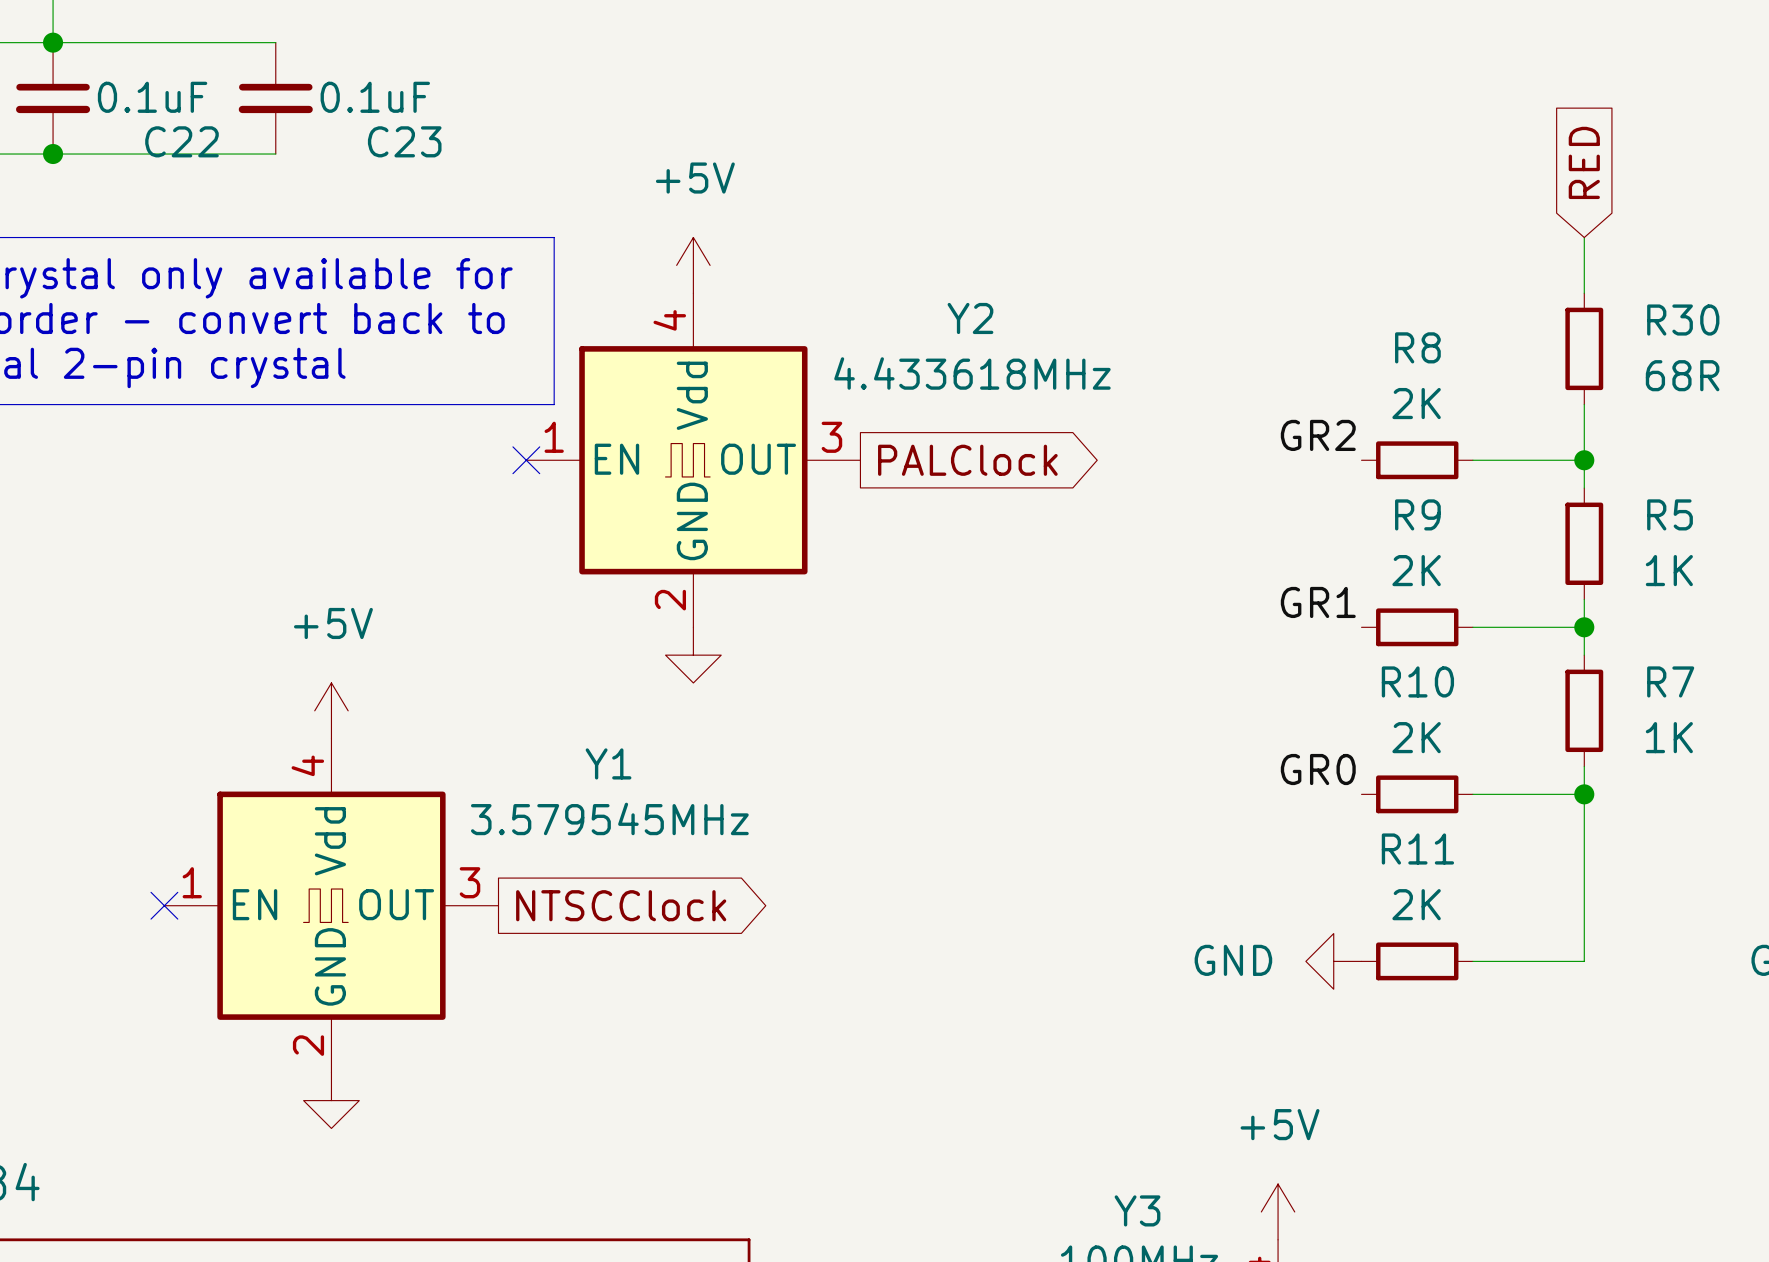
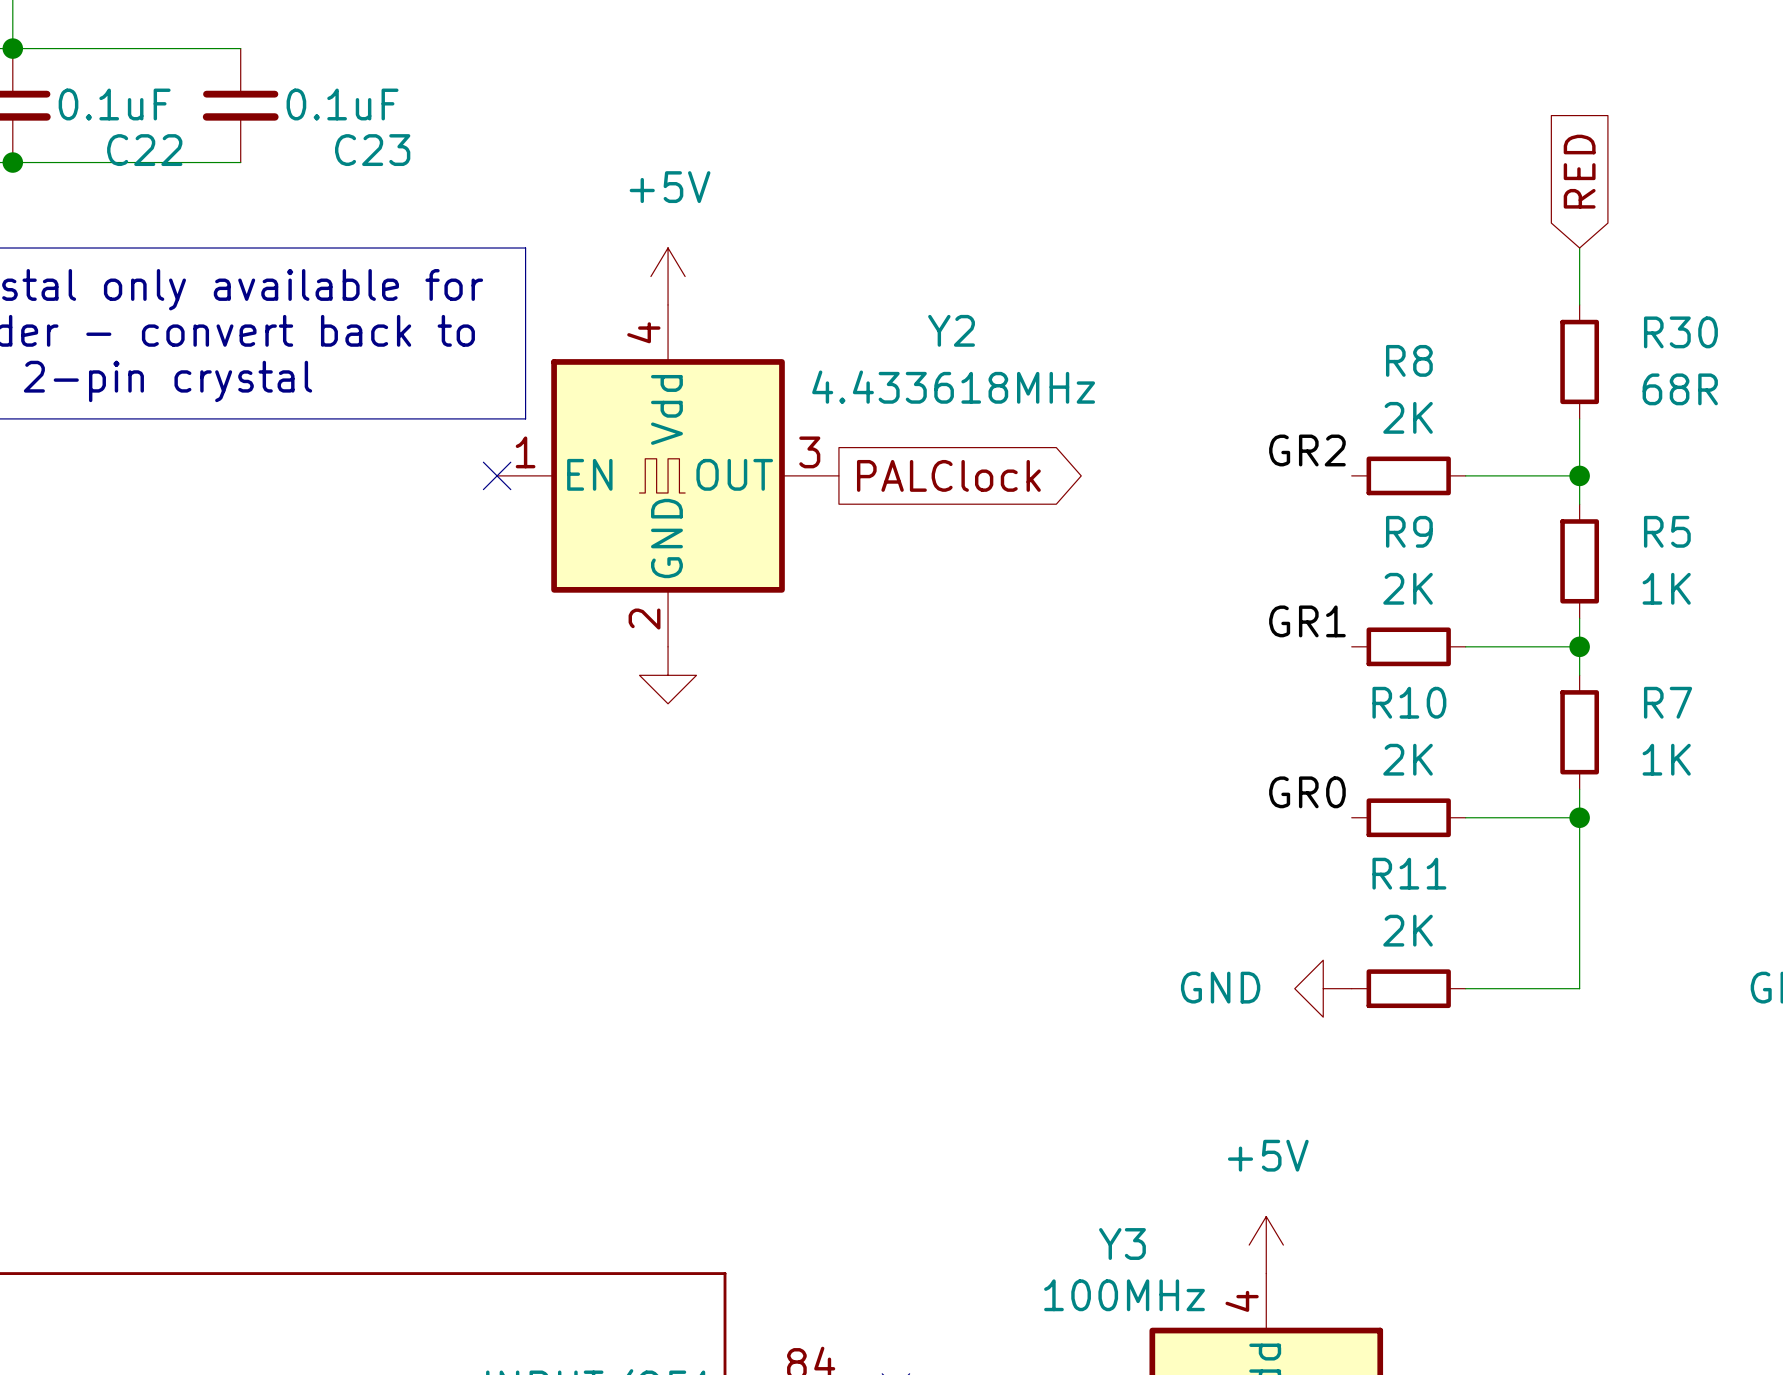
power symbol: +5V (331, 710) -> none
no-connect mark: (164, 905) -> none
Y1: 3.579545MHz (331, 905) -> none
global label: NTSCClock (621, 905) -> none
power symbol: (331, 1100) -> none

